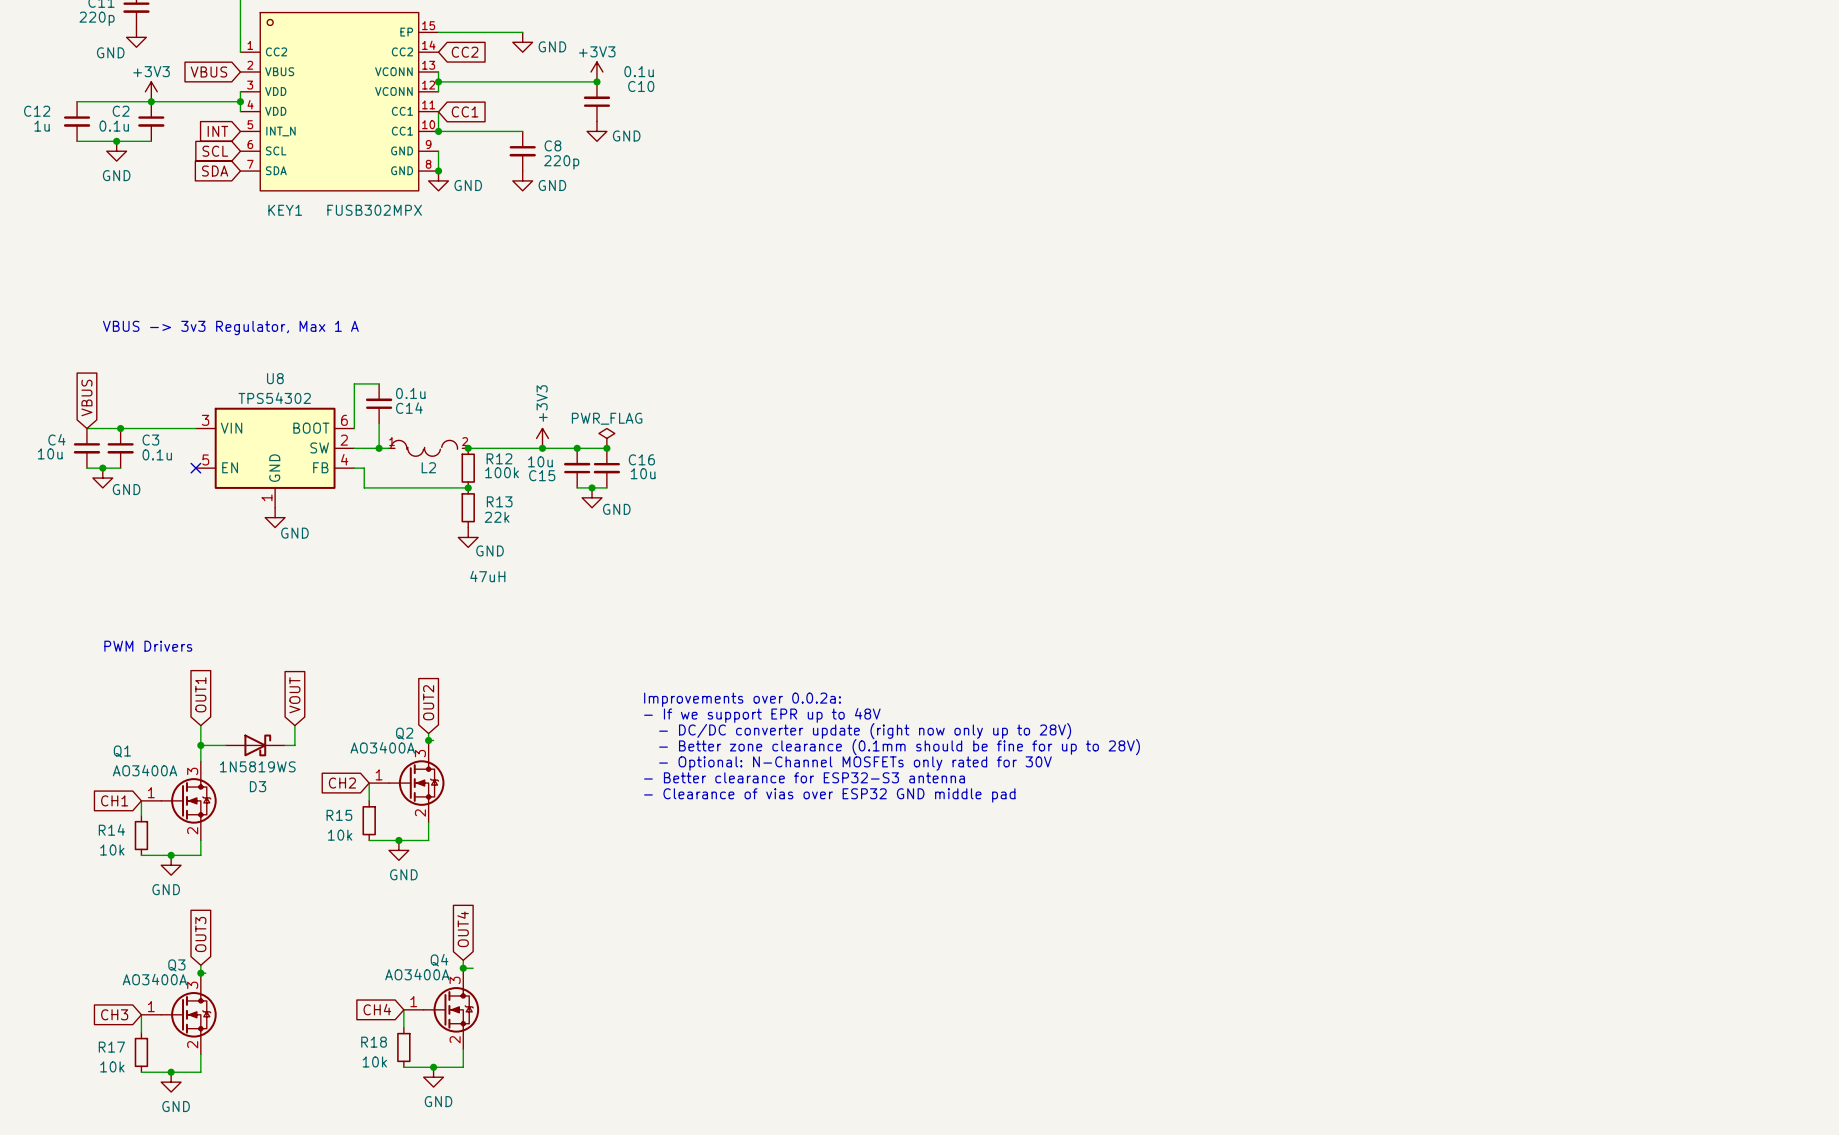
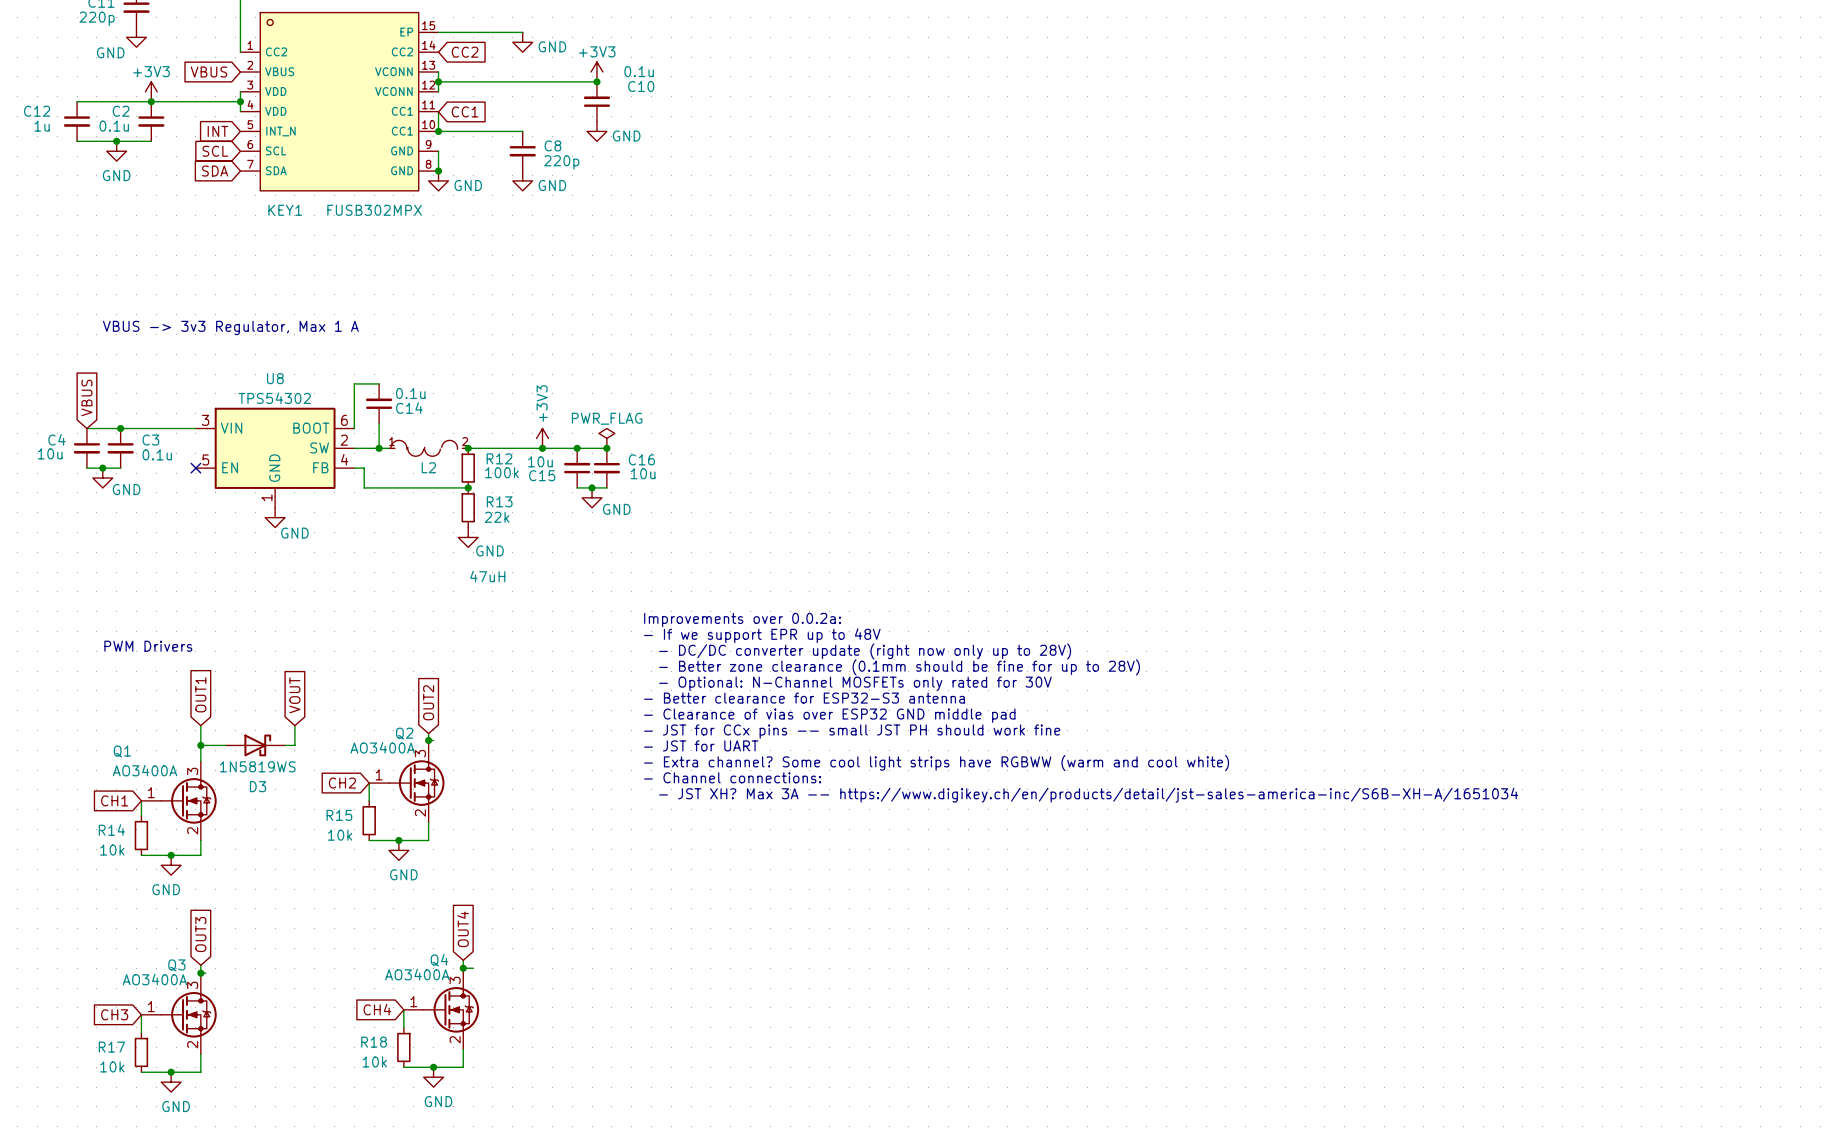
text: none -> Improvements over 0.0.2a: (742, 620)
text: none -> - If we support EPR up to 48V (762, 635)
text: none -> - DC/DC converter update (right now only up to 28V) (865, 651)
text: none -> - Better zone clearance (0.1mm should be fine for up to 28V) (899, 667)
text: none -> - Optional: N-Channel MOSFETs only rated for 30V (855, 683)
text: Improvements over 0.0.2a: (742, 699) -> - Better clearance for ESP32-S3 antenna (804, 698)
text: - If we support EPR up to 48V (762, 715) -> - Clearance of vias over ESP32 GND middle pad (829, 715)
text: - DC/DC converter update (right now only up to 28V) (865, 731) -> - JST for CCx pins -- small JST PH should work fine (852, 731)
text: - Better zone clearance (0.1mm should be fine for up to 28V) (899, 747) -> - JST for UART (701, 745)
text: - Optional: N-Channel MOSFETs only rated for 30V (855, 763) -> - Extra channel? Some cool light strips have RGBWW (warm and cool white) (936, 763)
text: - Better clearance for ESP32-S3 antenna (804, 777) -> - Channel connections: (732, 777)
text: - Clearance of vias over ESP32 GND middle pad (829, 795) -> - JST XH? Max 3A -- https://www.digikey.ch/en/products/detail/jst-sales-america-inc/S6B-XH-A/1651034 (1088, 795)

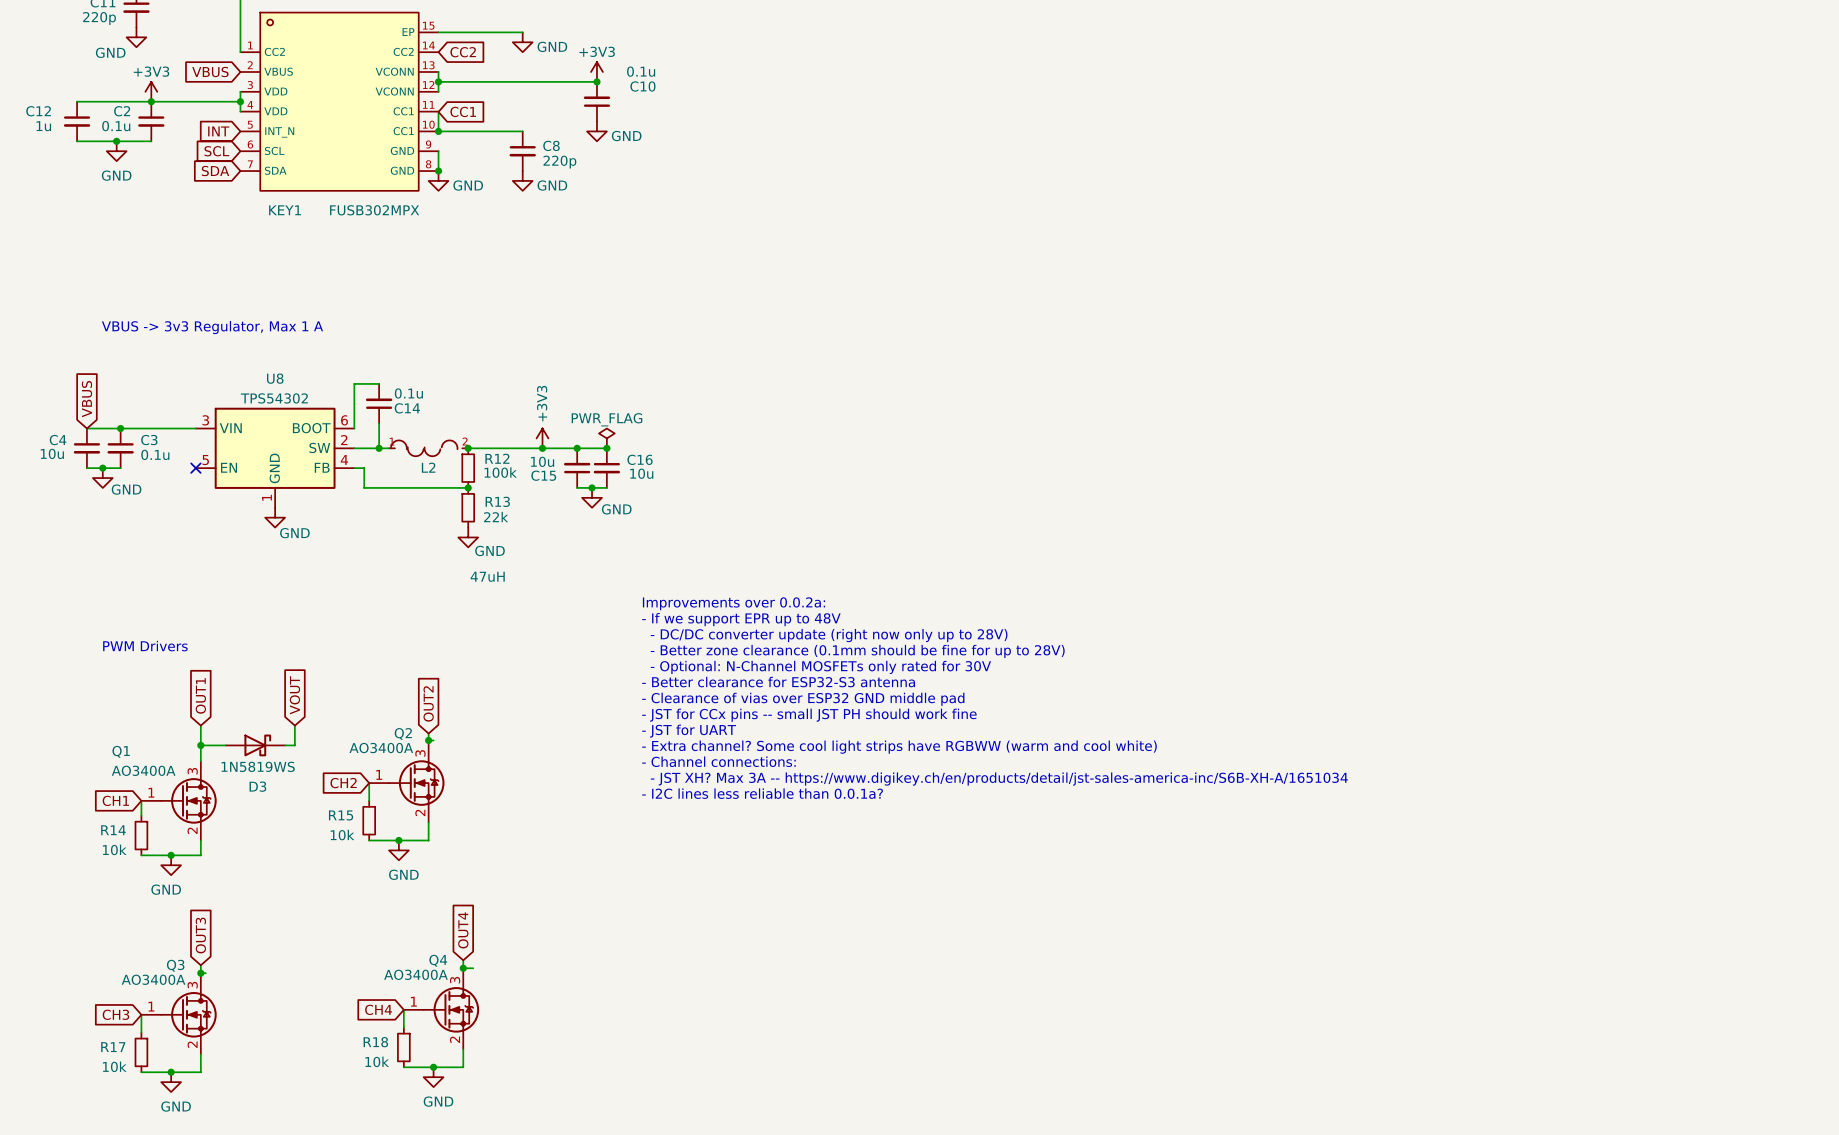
text: none -> Improvements over 0.0.2a: (733, 603)
text: Improvements over 0.0.2a: (742, 620) -> - If we support EPR up to 48V (741, 619)
text: - If we support EPR up to 48V (762, 635) -> - DC/DC converter update (right now only up to 28V) (829, 635)
text: - DC/DC converter update (right now only up to 28V) (865, 651) -> - Better zone clearance (0.1mm should be fine for up to 28V) (857, 651)
text: - Better zone clearance (0.1mm should be fine for up to 28V) (899, 667) -> - Optional: N-Channel MOSFETs only rated for 30V (820, 667)
text: - Optional: N-Channel MOSFETs only rated for 30V (855, 683) -> - Better clearance for ESP32-S3 antenna (778, 682)
text: - Better clearance for ESP32-S3 antenna (804, 698) -> - Clearance of vias over ESP32 GND middle pad (803, 699)
text: - Clearance of vias over ESP32 GND middle pad (829, 715) -> - JST for CCx pins -- small JST PH should work fine (809, 715)
text: - JST for CCx pins -- small JST PH should work fine (852, 731) -> - JST for UART (689, 731)
text: - JST for UART (701, 745) -> - Extra channel? Some cool light strips have RGBWW (warm and cool white) (899, 747)
text: - Extra channel? Some cool light strips have RGBWW (warm and cool white) (936, 763) -> - Channel connections: (718, 761)
text: - Channel connections: (732, 777) -> - JST XH? Max 3A -- https://www.digikey.ch/en/products/detail/jst-sales-america-inc/S6B-XH-A/1651034 (999, 779)
text: - JST XH? Max 3A -- https://www.digikey.ch/en/products/detail/jst-sales-america-inc/S6B-XH-A/1651034 (1088, 795) -> - I2C lines less reliable than 0.0.1a? (762, 793)

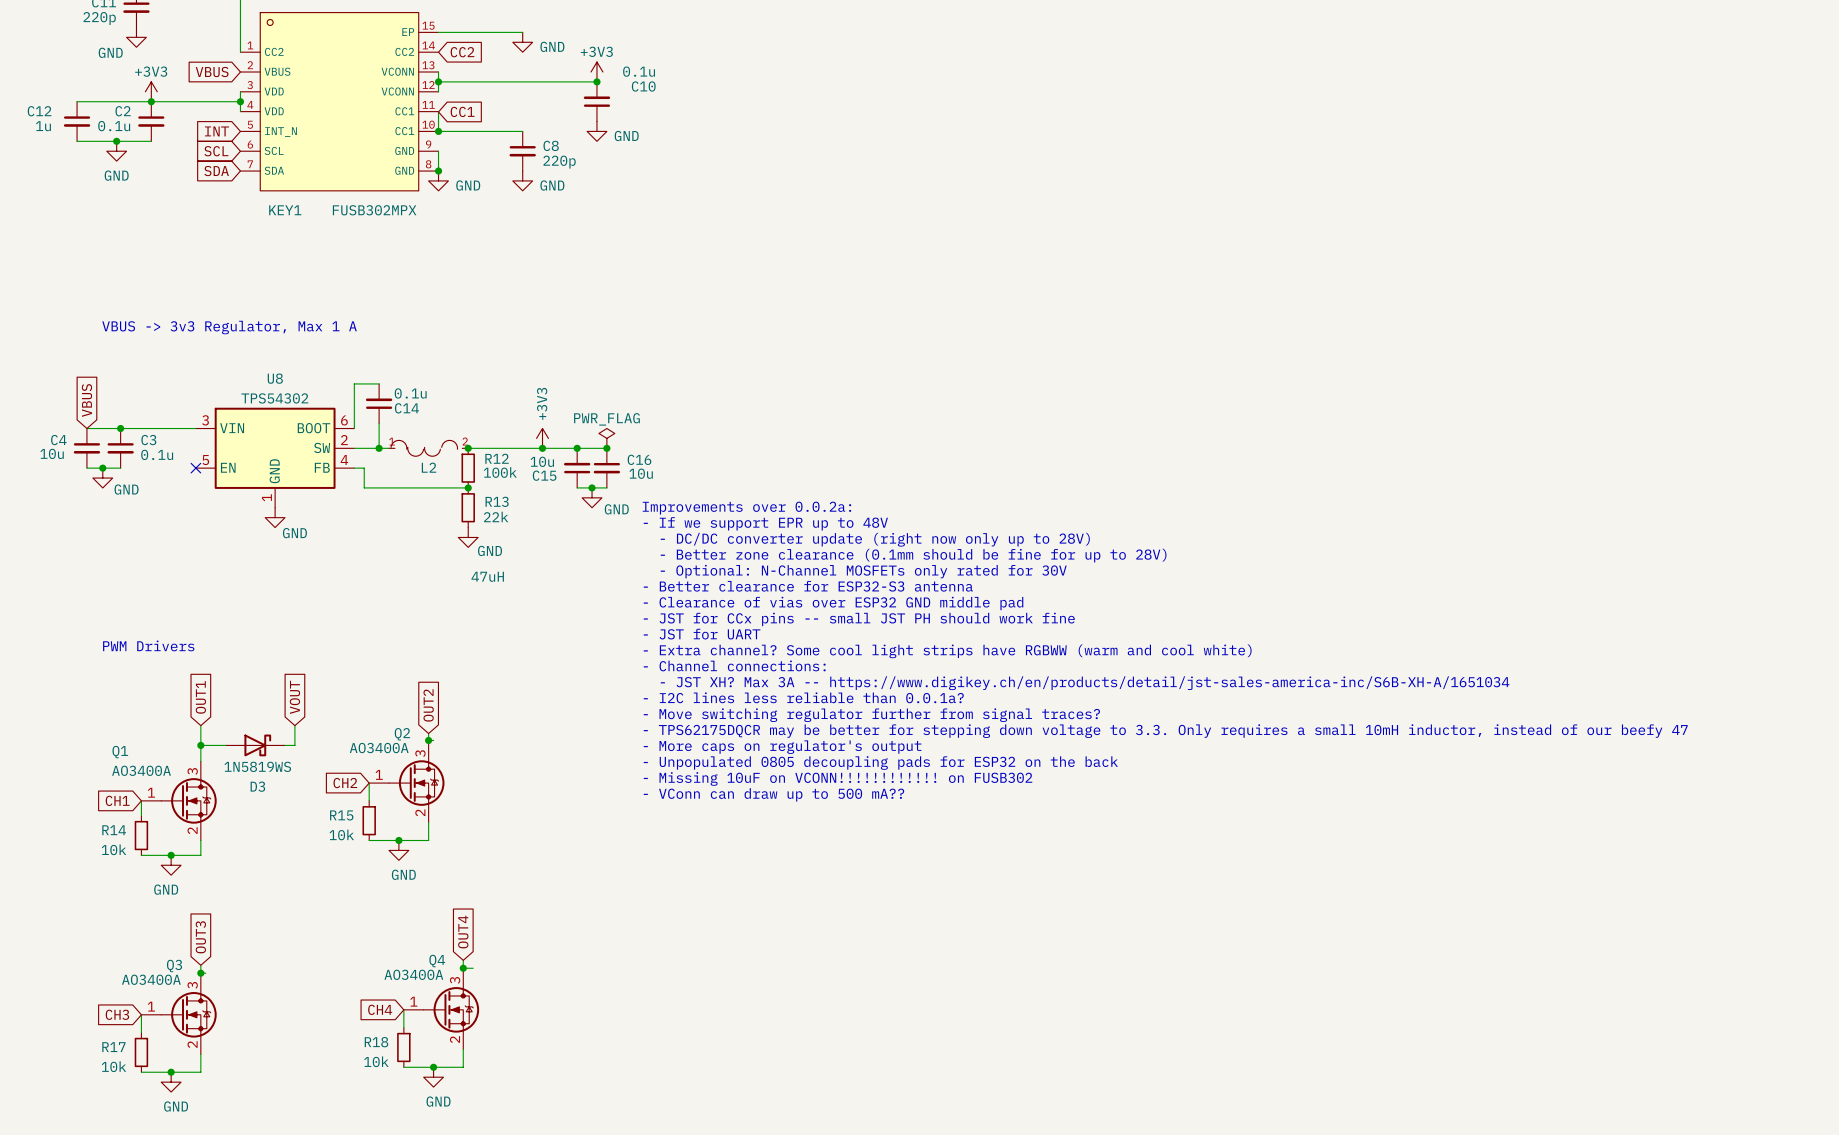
text: none -> Improvements over 0.0.2a: (746, 508)
text: none -> - If we support EPR up to 48V (765, 523)
text: none -> - DC/DC converter update (right now only up to 28V) (875, 539)
text: none -> - Better zone clearance (0.1mm should be fine for up to 28V) (913, 555)
text: none -> - Optional: N-Channel MOSFETs only rated for 30V (863, 571)
text: none -> - Better clearance for ESP32-S3 antenna (808, 586)
text: Improvements over 0.0.2a: (733, 603) -> - Clearance of vias over ESP32 GND middle pad (833, 603)
text: - If we support EPR up to 48V (741, 619) -> - JST for CCx pins -- small JST PH should work fine (859, 619)
text: - DC/DC converter update (right now only up to 28V) (829, 635) -> - JST for UART (702, 634)
text: - Better zone clearance (0.1mm should be fine for up to 28V) (857, 651) -> - Extra channel? Some cool light strips have RGBWW (warm and cool white) (947, 651)
text: - Optional: N-Channel MOSFETs only rated for 30V (820, 667) -> - Channel connections: (734, 665)
text: - Better clearance for ESP32-S3 antenna (778, 682) -> - JST XH? Max 3A -- https://www.digikey.ch/en/products/detail/jst-sales-america-inc/S6B-XH-A/1651034 (1085, 683)
text: - Clearance of vias over ESP32 GND middle pad (803, 699) -> - I2C lines less reliable than 0.0.1a? (803, 697)
text: - JST for CCx pins -- small JST PH should work fine (809, 715) -> - Move switching regulator further from signal traces? (871, 715)
text: - JST for UART (689, 731) -> - TPS62175DQCR may be better for stepping down voltage to 3.3. Only requires a small 10mH inductor, instead of our beefy 47 (1165, 731)
text: - Extra channel? Some cool light strips have RGBWW (warm and cool white) (899, 747) -> - More caps on regulator's output (782, 747)
text: - Channel connections: (718, 761) -> - Unpopulated 0805 decoupling pads for ESP32 on the back (880, 763)
text: - JST XH? Max 3A -- https://www.digikey.ch/en/products/detail/jst-sales-america-inc/S6B-XH-A/1651034 (999, 779) -> - Missing 10uF on VCONN!!!!!!!!!!!! on FUSB302 (838, 778)
text: - I2C lines less reliable than 0.0.1a? (762, 793) -> - VConn can draw up to 500 mA?? (773, 794)

